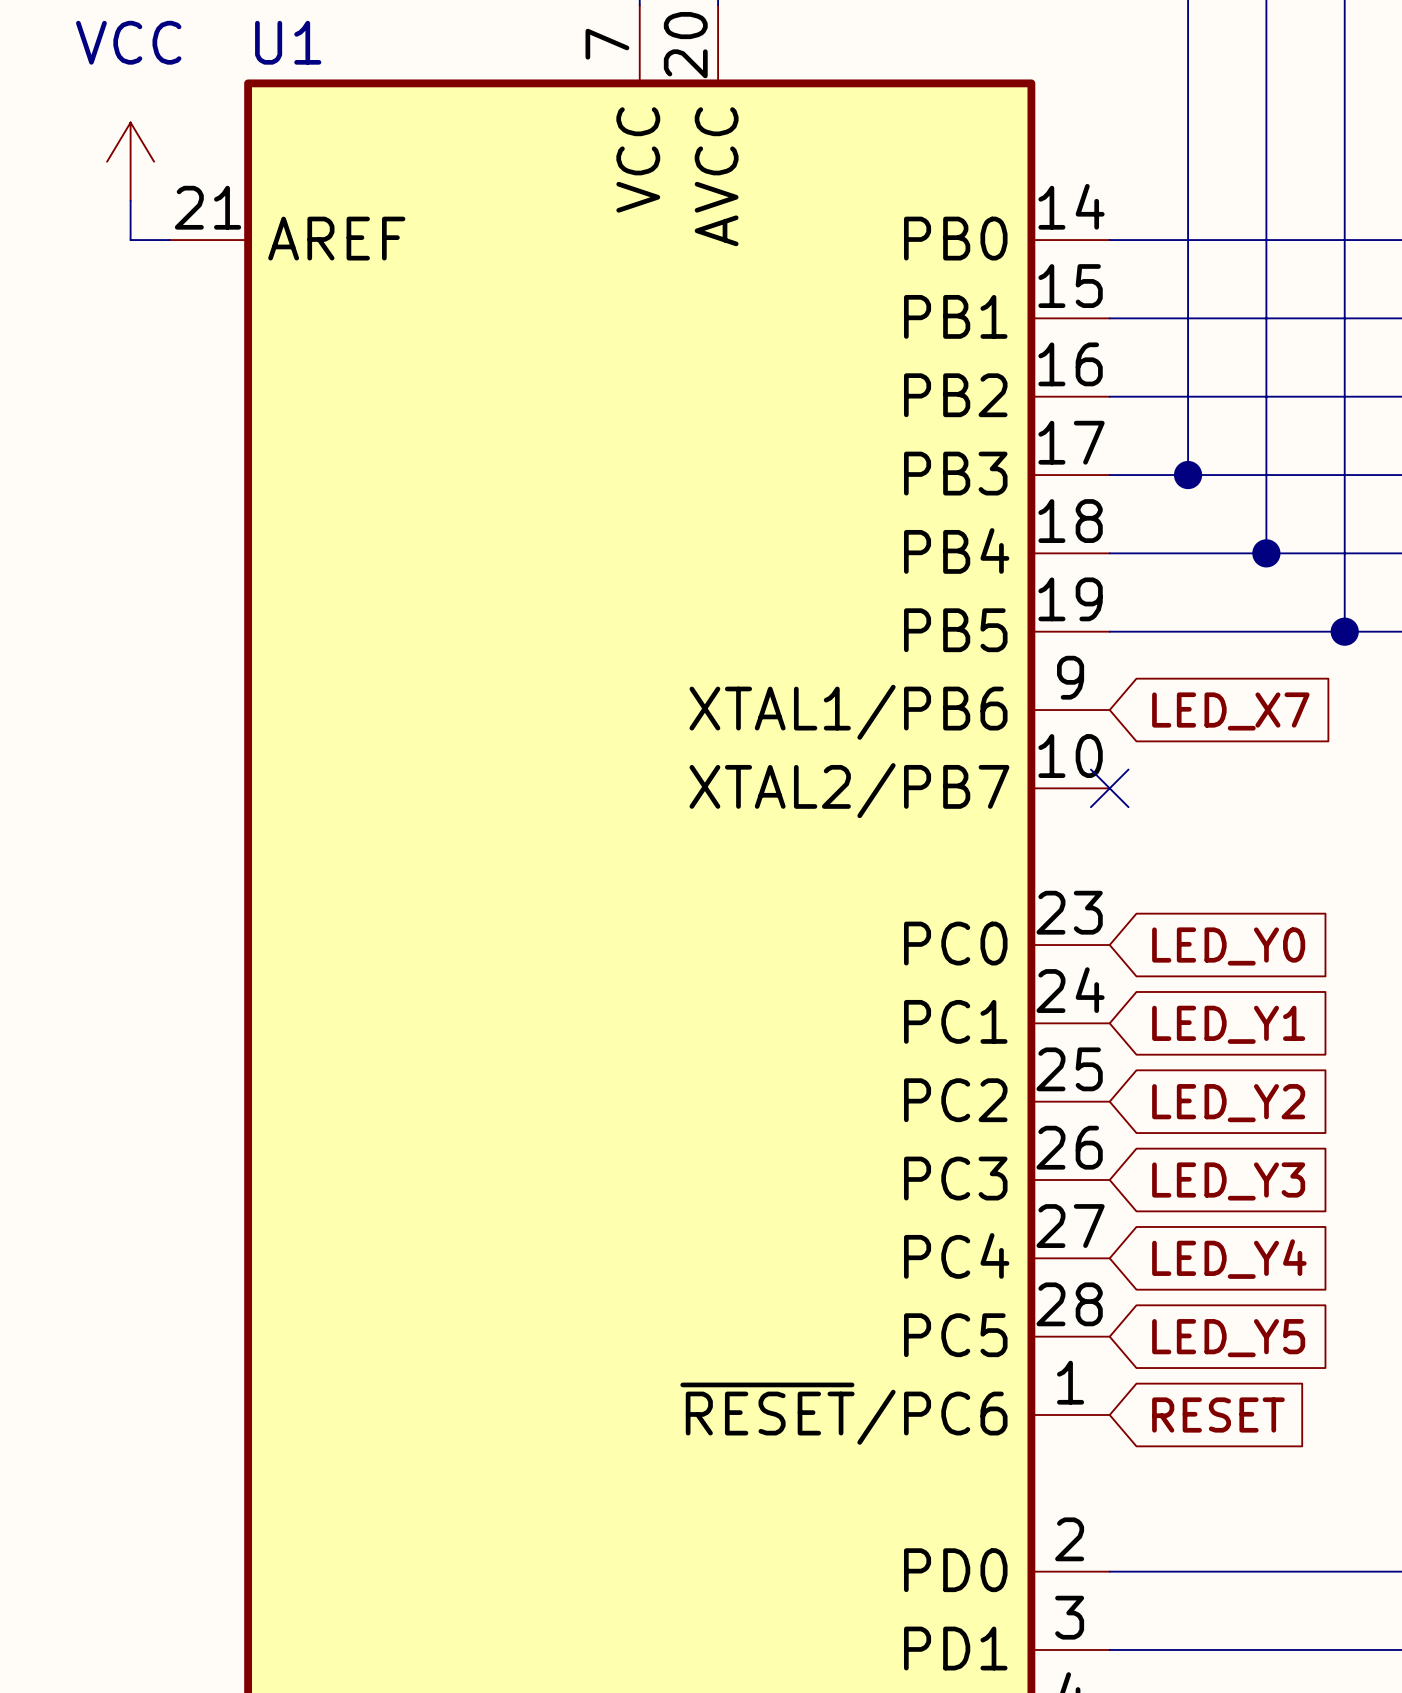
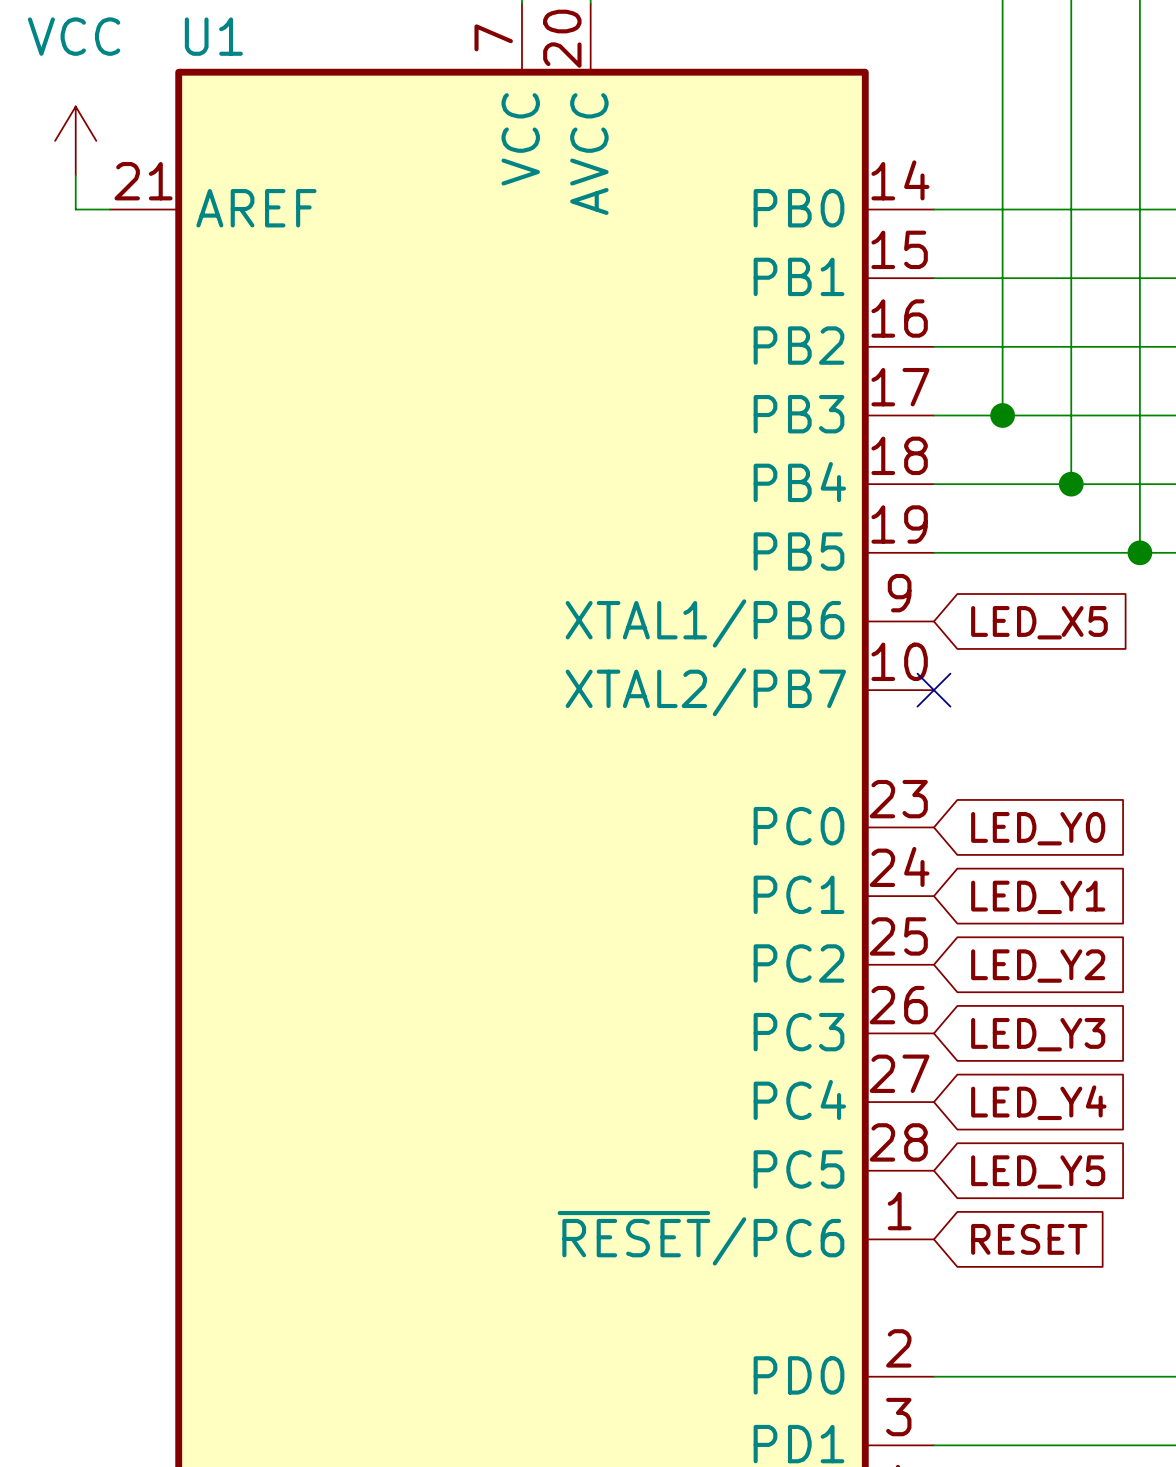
global label: LED_X7 (1230, 711) -> LED_X5 (1039, 622)

